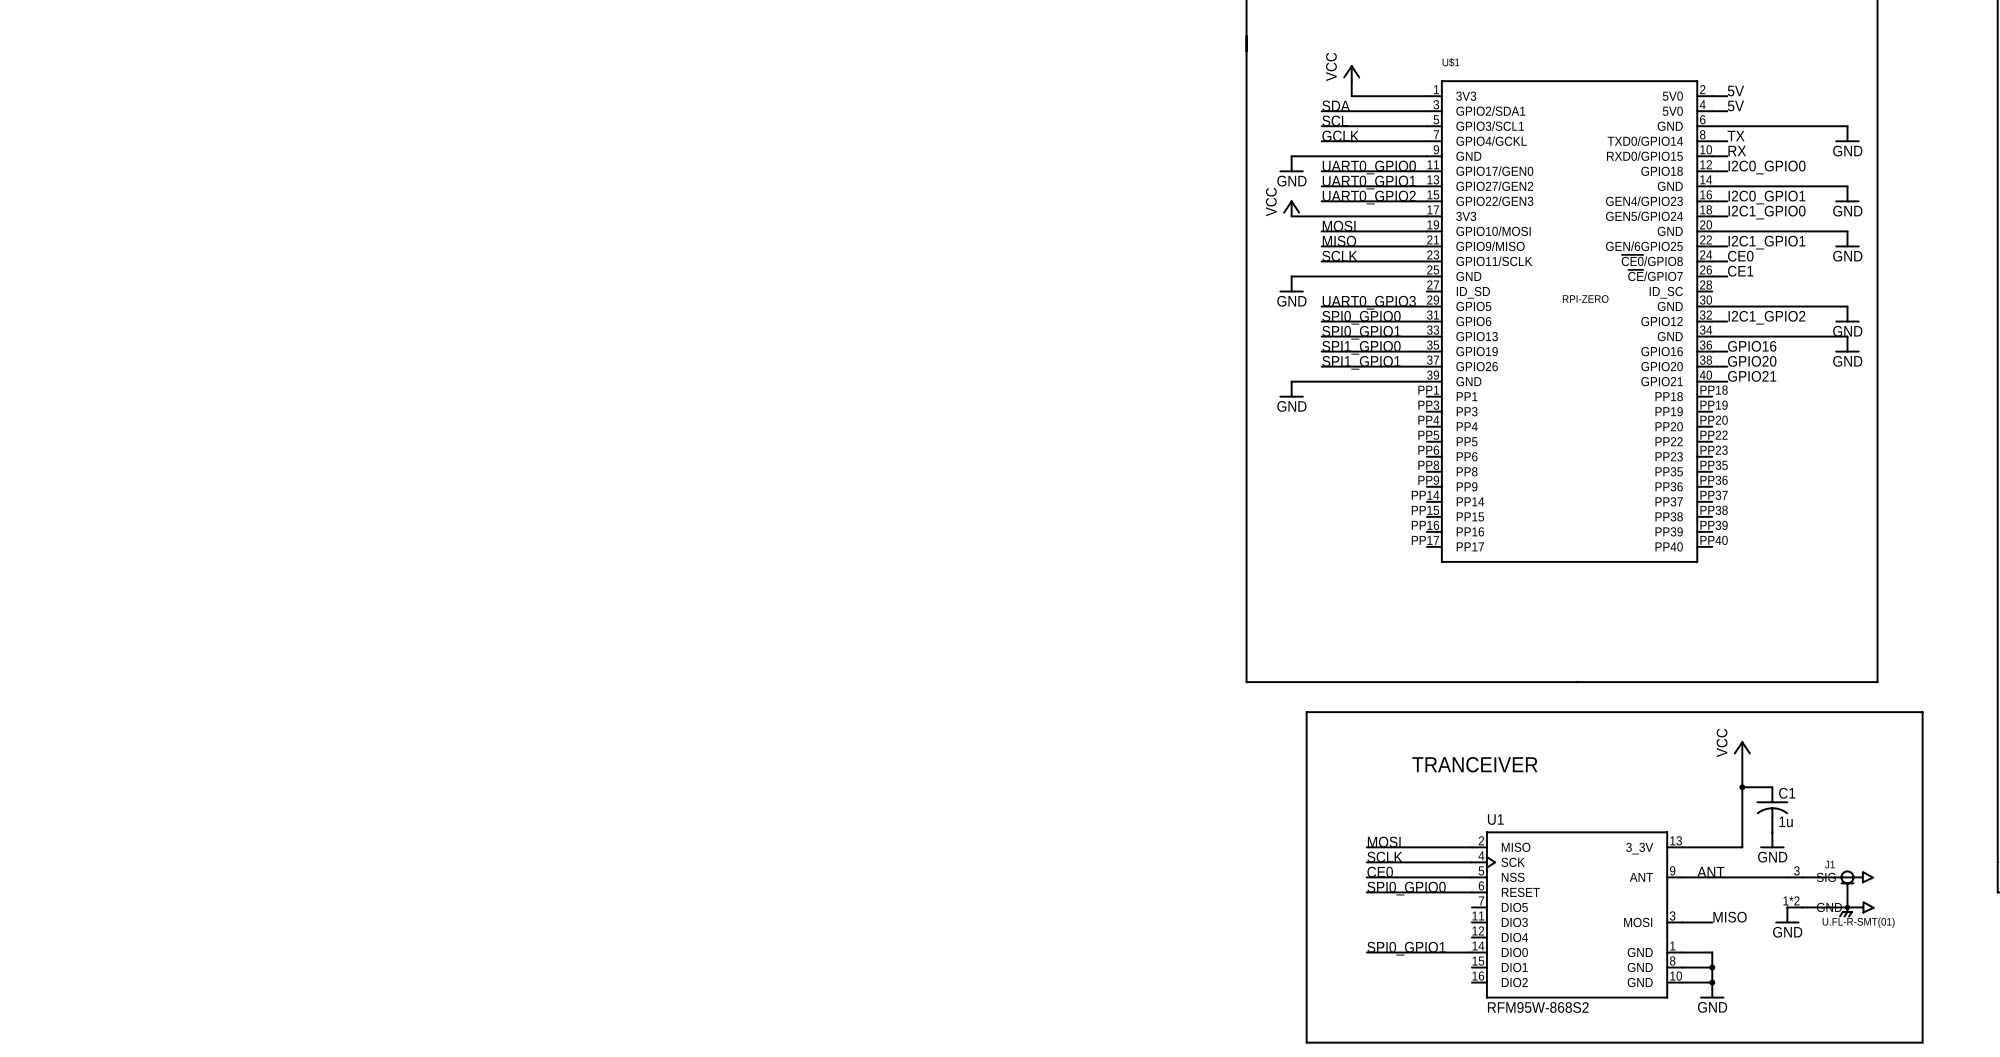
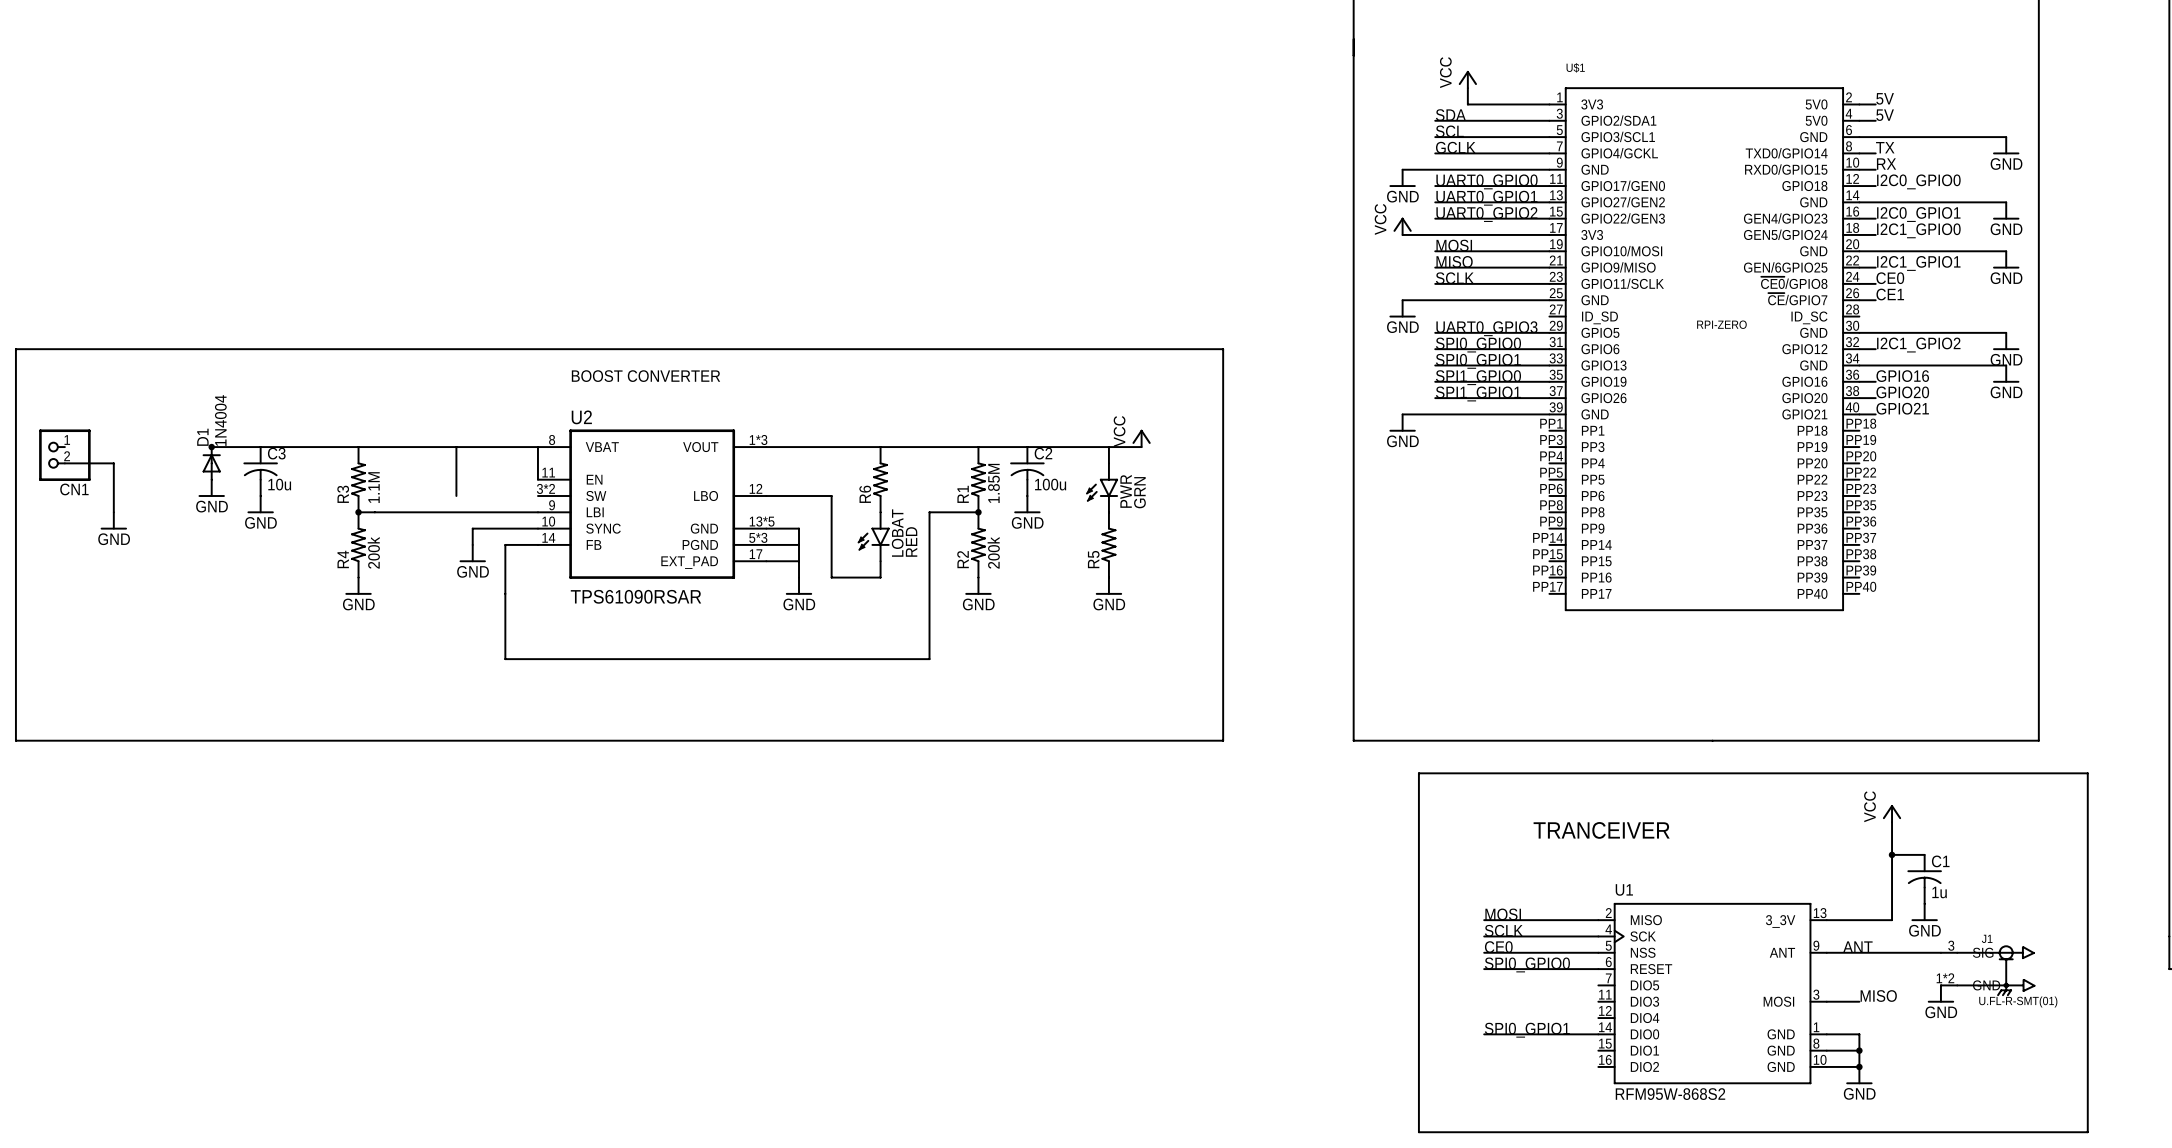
line: none -> (15, 349) (1223, 349) (1223, 740) (15, 740) (15, 349)
text: none -> BOOST CONVERTER (645, 376)
power symbol: none -> VCC (1141, 438)
wire: none -> (211, 447) (537, 447) (537, 479)
junction: none -> (211, 447)
wire: none -> (456, 447) (456, 496)
wire: none -> (766, 447) (1141, 447)
wire: none -> (1108, 447) (1108, 463)
CN1: none -> (64, 455)
wire: none -> (64, 463) (113, 463) (113, 512)
D1: none -> 1N4004 (211, 463)
C3: none -> 10u (260, 471)
C2: none -> 100u (1027, 471)
R3: none -> 1.1M (358, 479)
R6: none -> (880, 479)
R1: none -> 1.85M (978, 479)
power symbol: none -> GND (211, 488)
PWR: none -> GRN (1102, 487)
wire: none -> (766, 496) (831, 496) (831, 577) (880, 577) (880, 561)
power symbol: none -> GND (260, 504)
U2: none -> TPS61090RSAR (652, 504)
power symbol: none -> GND (1027, 504)
wire: none -> (358, 512) (537, 512)
junction: none -> (358, 512)
wire: none -> (978, 512) (929, 512) (929, 659) (505, 659) (505, 544) (537, 544)
junction: none -> (978, 512)
power symbol: none -> GND (113, 520)
wire: none -> (537, 528) (472, 528) (472, 544)
wire: none -> (766, 528) (799, 528) (799, 577)
LOBAT: none -> RED (873, 536)
R4: none -> 200k (358, 544)
wire: none -> (766, 544) (799, 544)
R2: none -> 200k (978, 544)
R5: none -> (1108, 544)
power symbol: none -> GND (472, 553)
wire: none -> (766, 561) (799, 561)
power symbol: none -> GND (358, 586)
power symbol: none -> GND (799, 586)
power symbol: none -> GND (978, 586)
power symbol: none -> GND (1108, 586)

